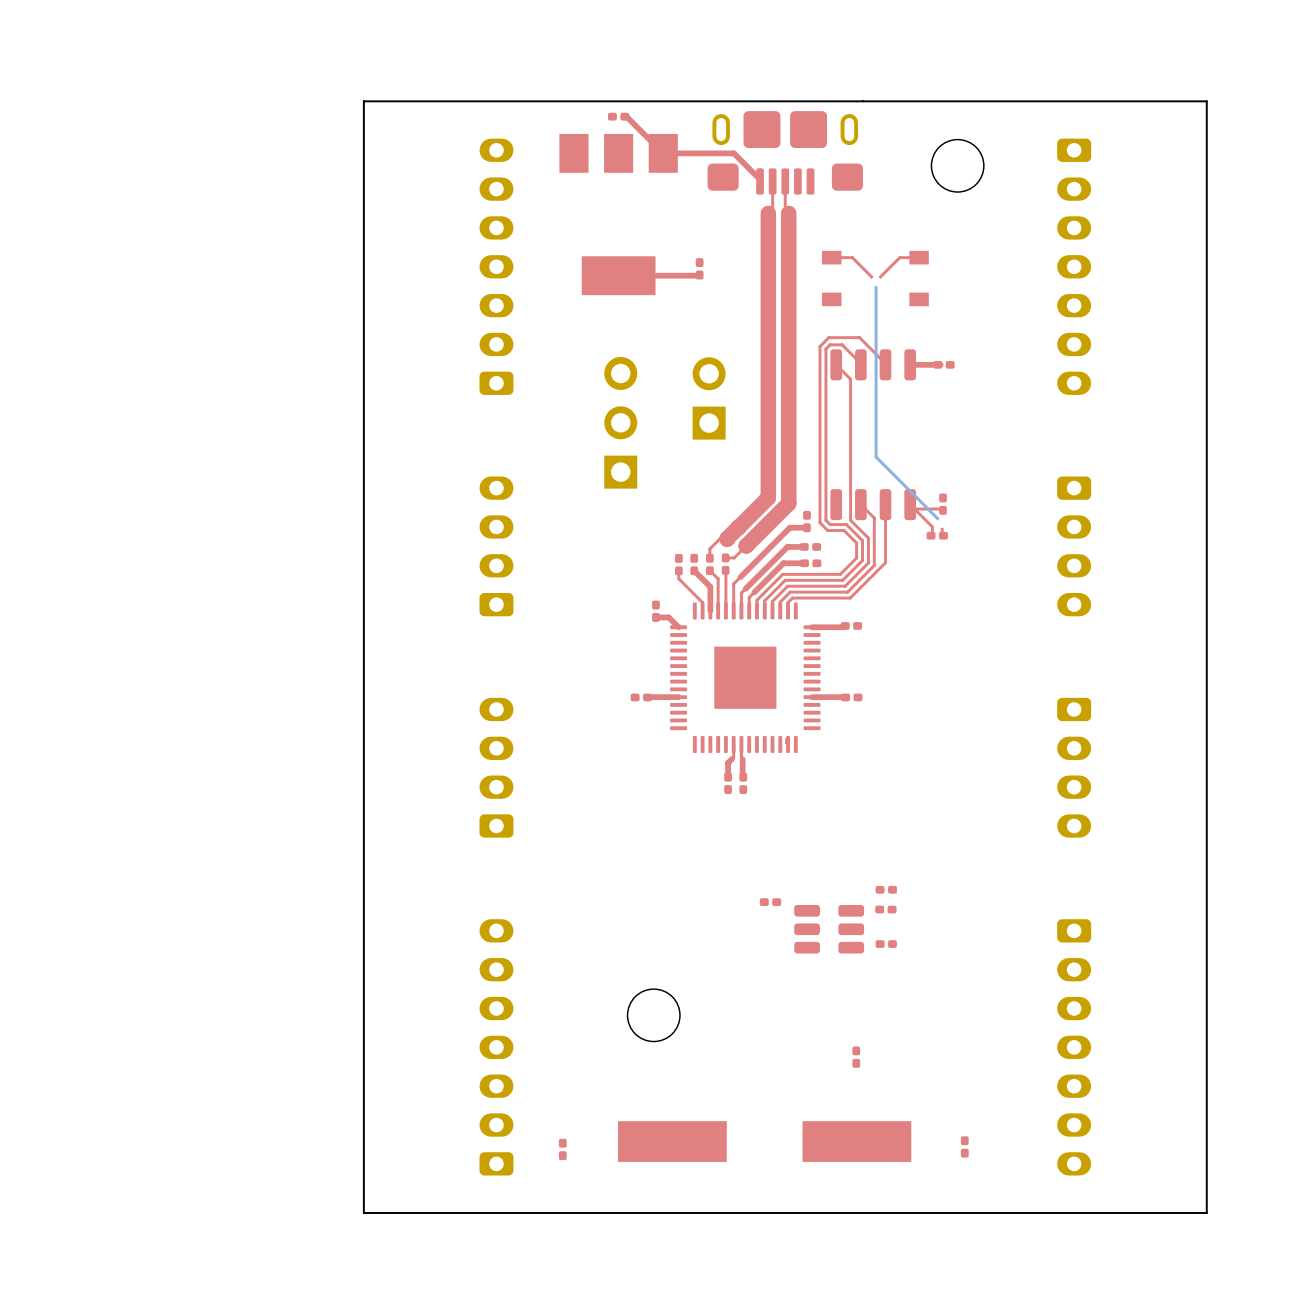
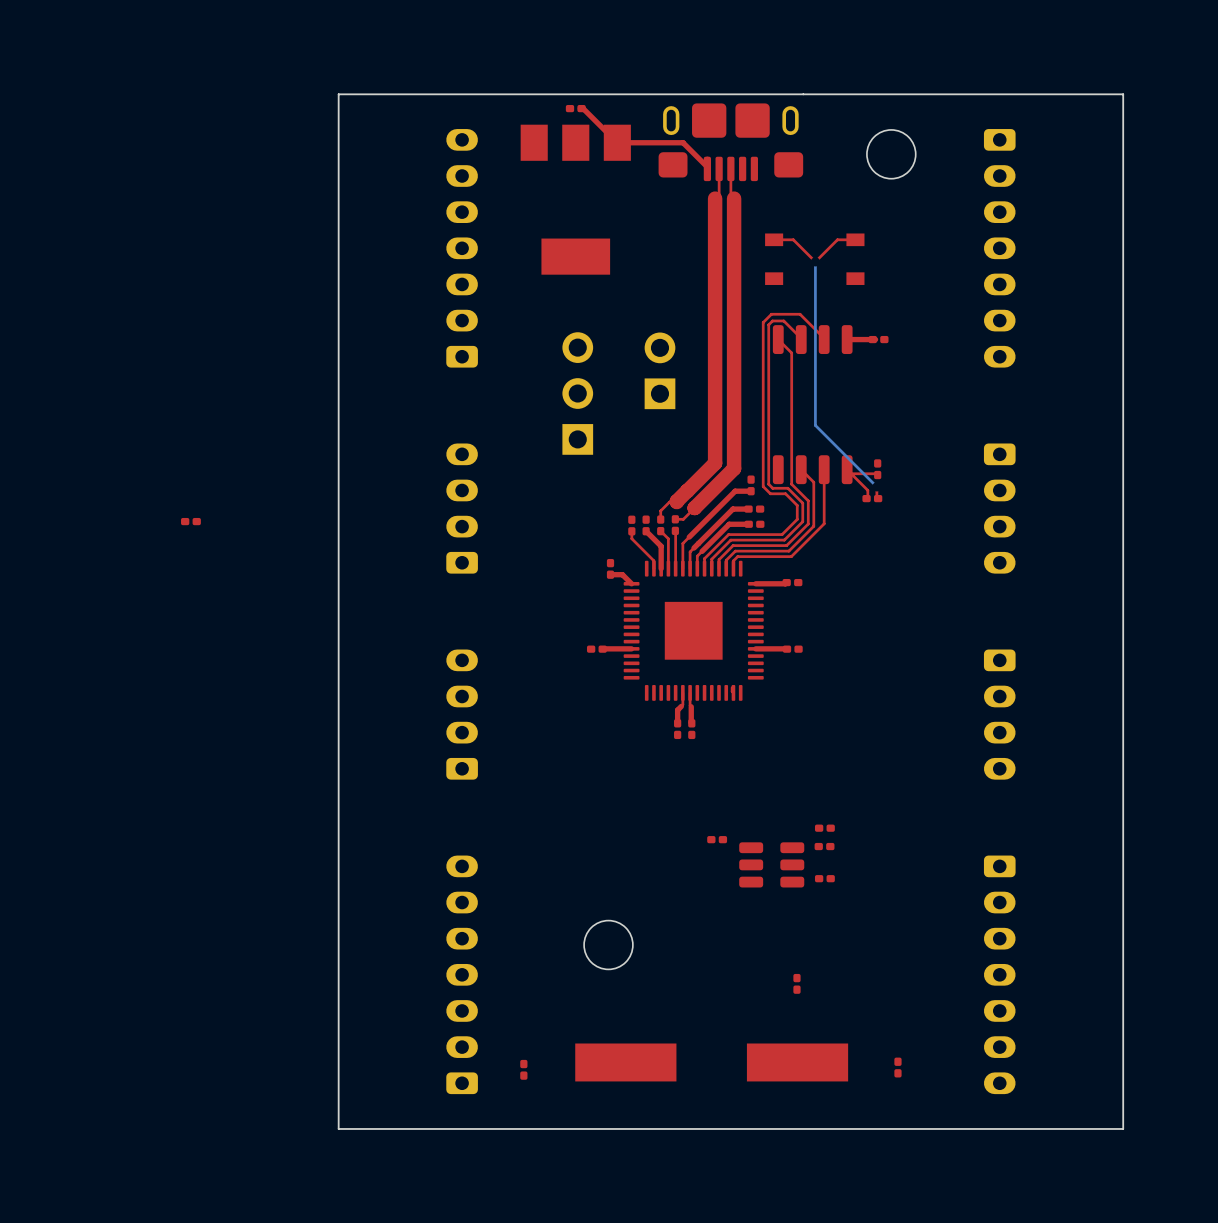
part: (699, 268) -> none
top track: (699, 275) (618, 275) -> none
part: none -> (190, 521)

